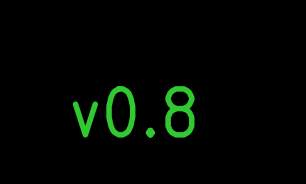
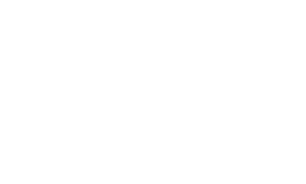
text: v0.8 (133, 111) -> none

